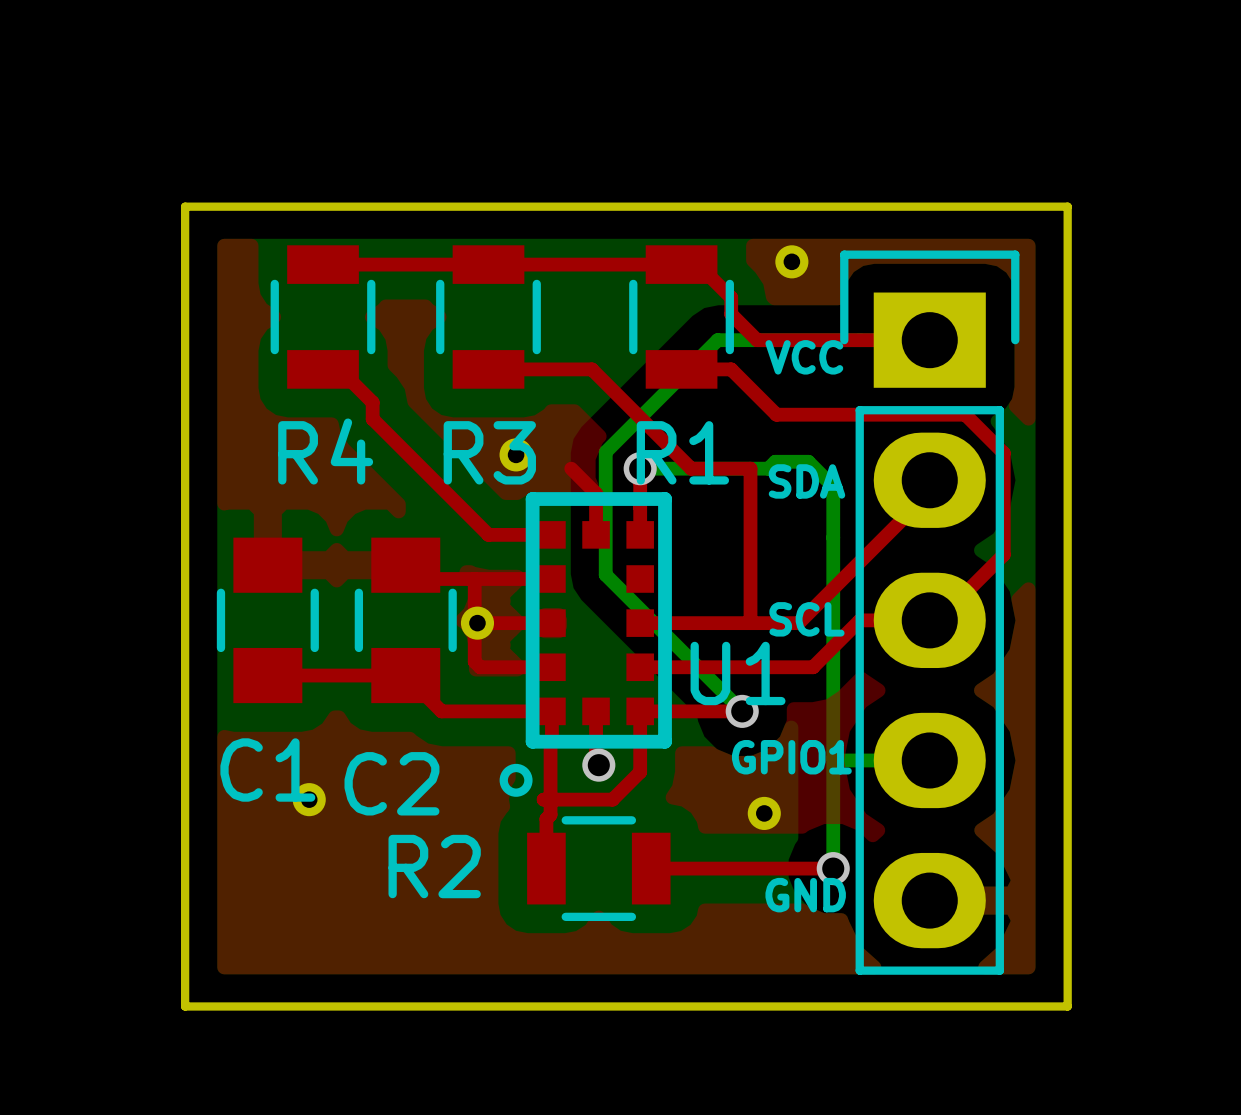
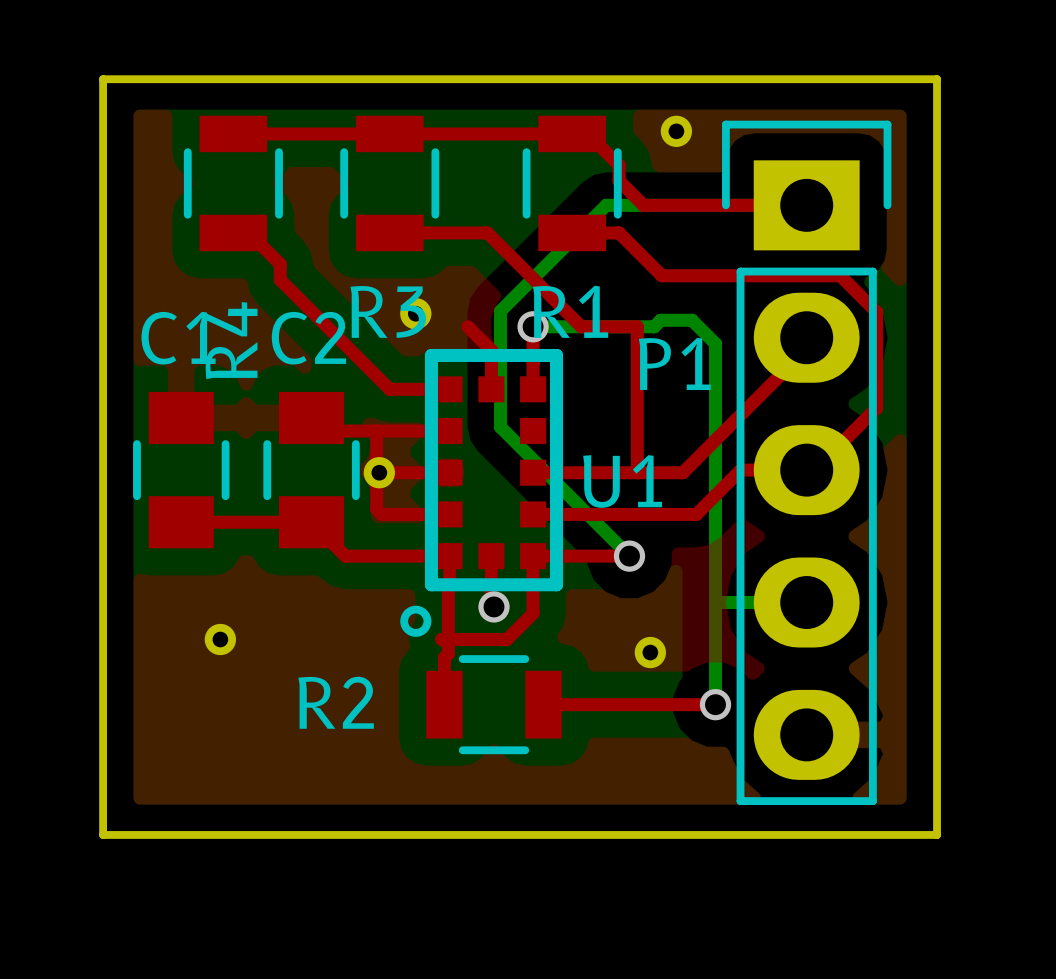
text: VCC (804, 357) -> none
R4 name rotation: 0° (325, 451) -> 90° counterclockwise (231, 340)
text: SDA (806, 481) -> none
P1 name: none -> P1 (674, 363)
text: SCL (806, 619) -> none
U1 name position: U1 (738, 673) -> U1 (622, 481)
text: GPIO1 (791, 757) -> none
C1 name position: C1 (267, 770) -> C1 (178, 338)
C2 name position: C2 (391, 783) -> C2 (308, 338)
text: GND (805, 895) -> none

